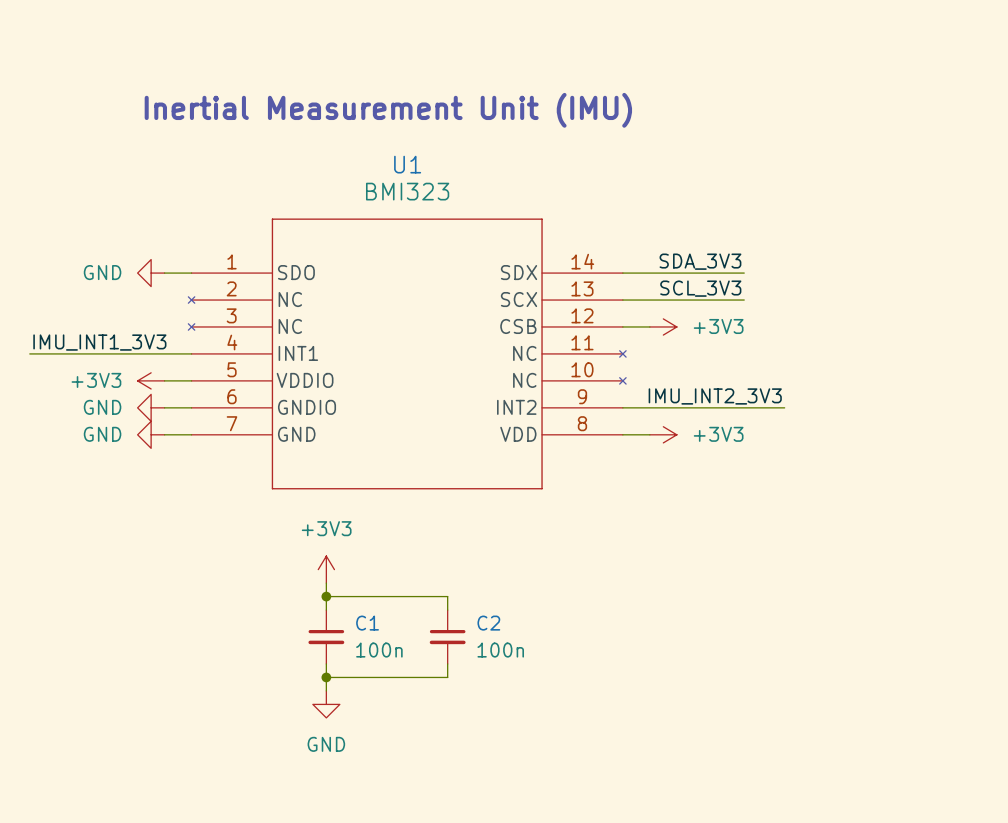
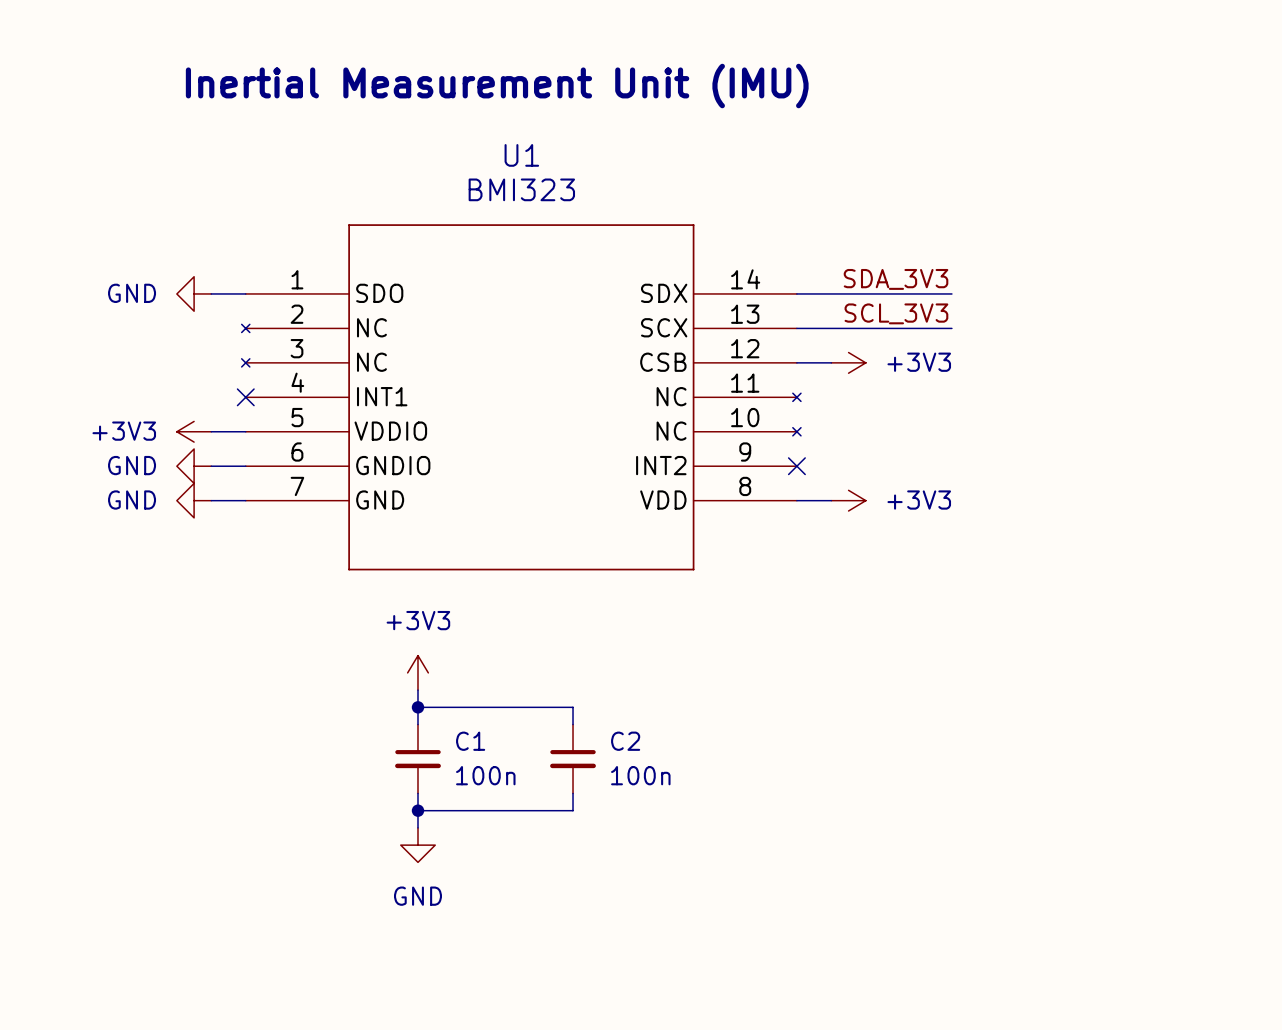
label: IMU_INT1_3V3 (99, 342) -> none
wire: (29, 353) (191, 353) -> none
no-connect mark: none -> (245, 397)
label: IMU_INT2_3V3 (715, 396) -> none
wire: (622, 407) (784, 407) -> none
no-connect mark: none -> (796, 466)

